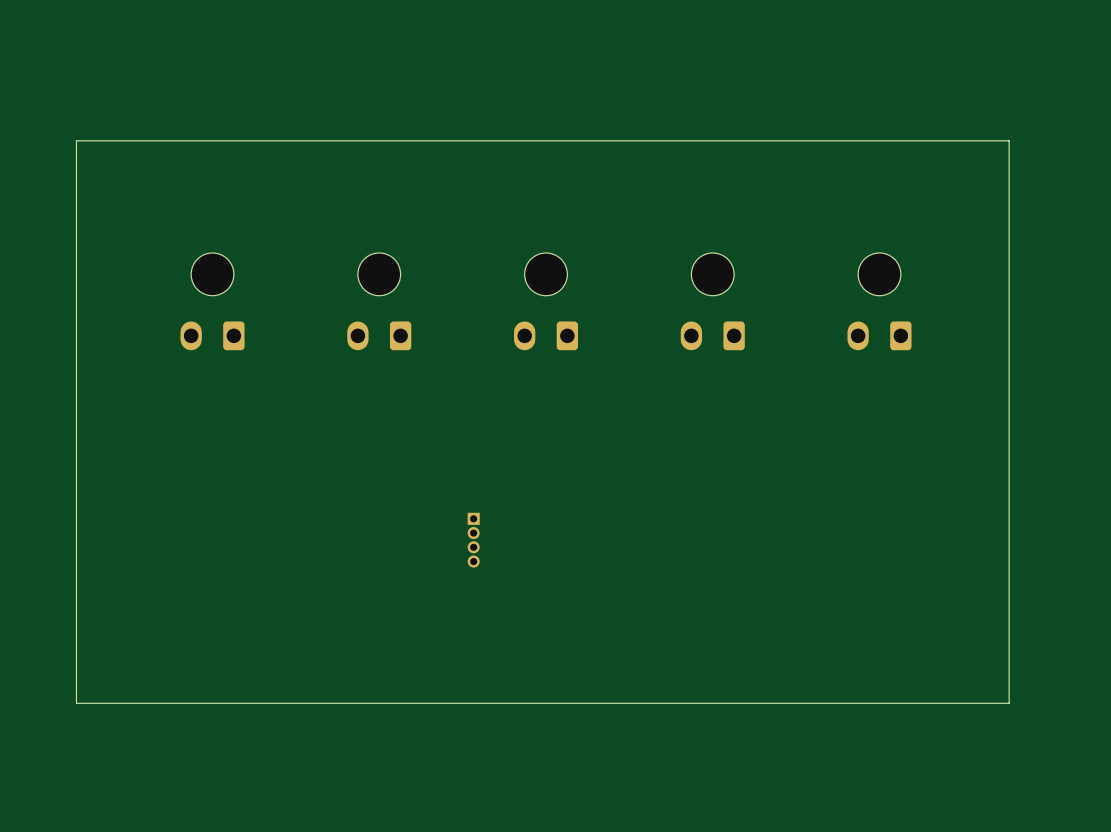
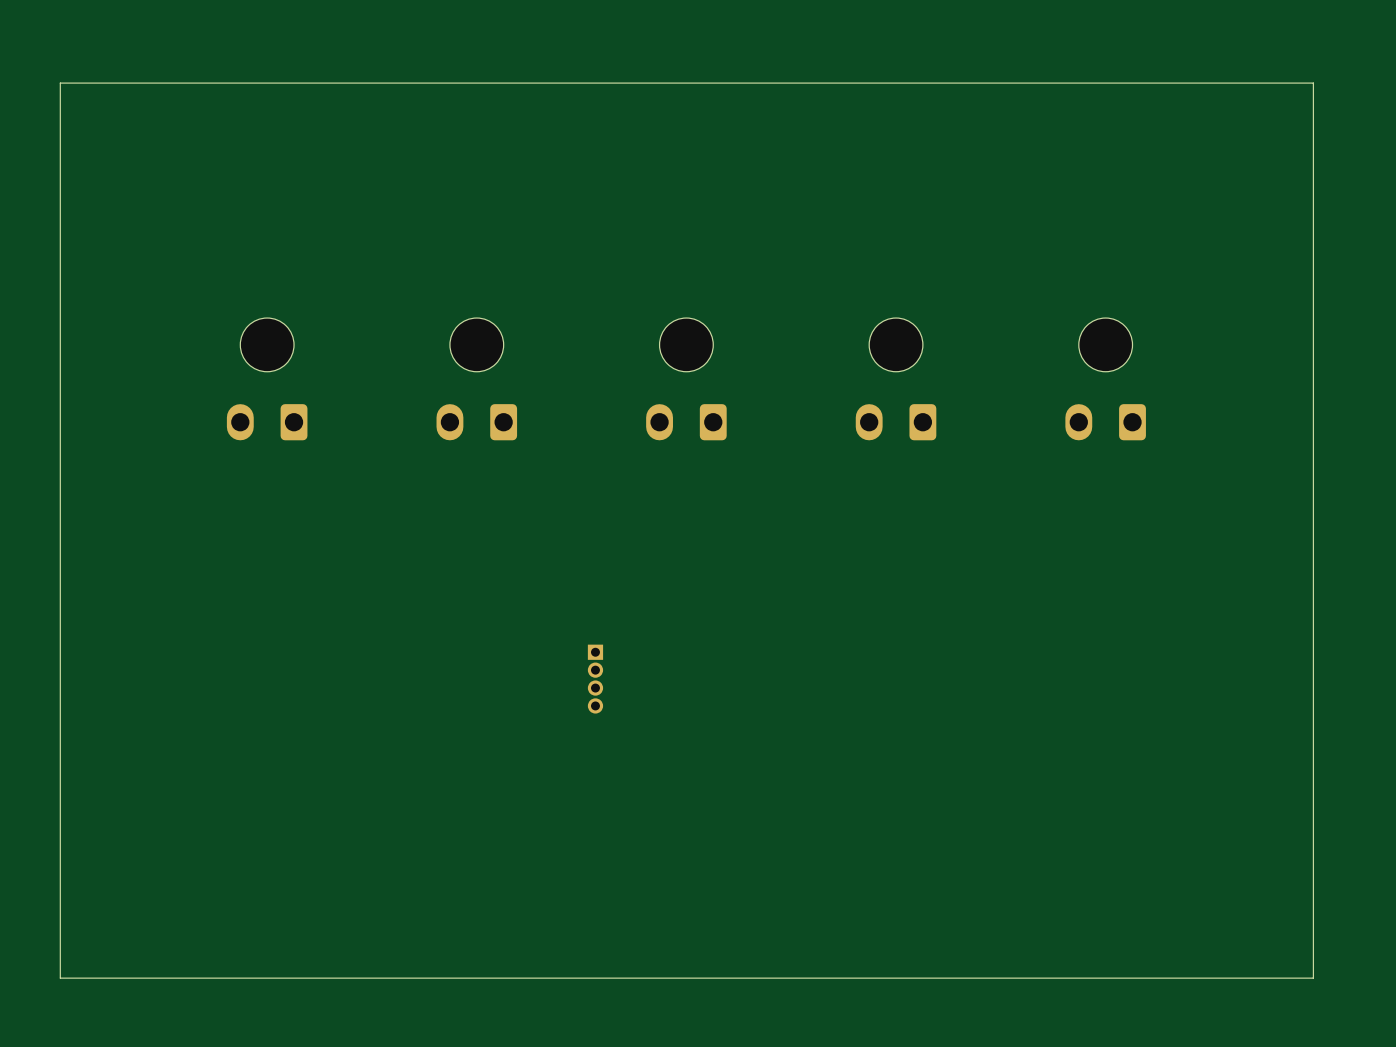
board edge: (1009, 140) (76, 140) (76, 703) (1009, 703) (1009, 140) -> (1313, 83) (1313, 978) (60, 978) (60, 83) (1313, 83)

